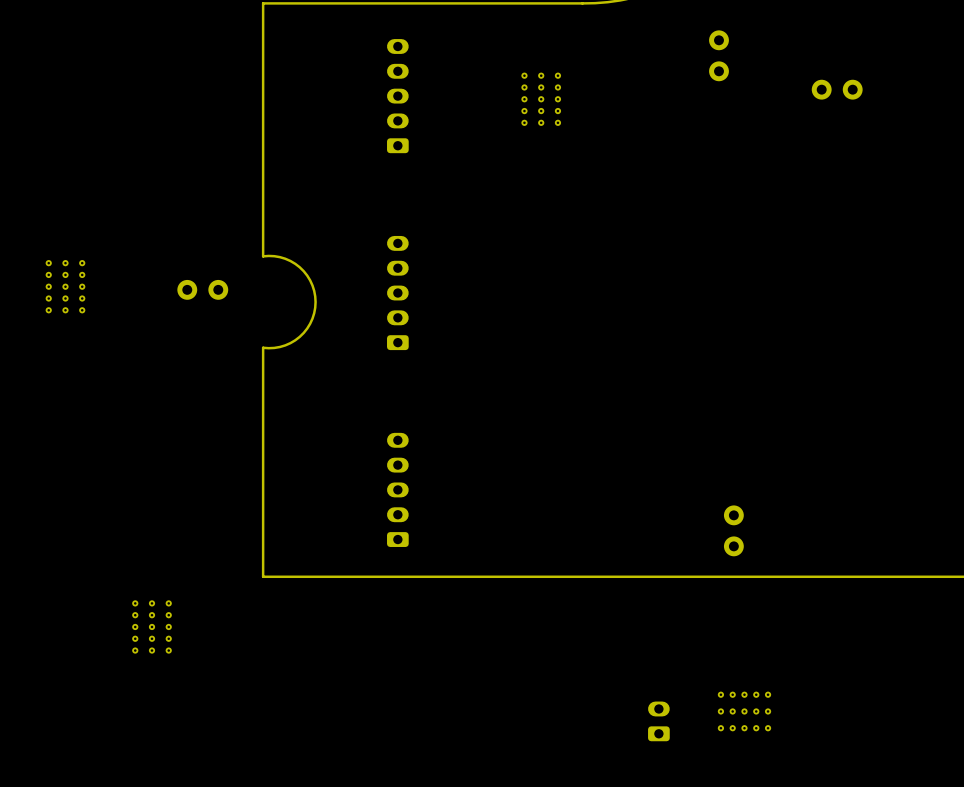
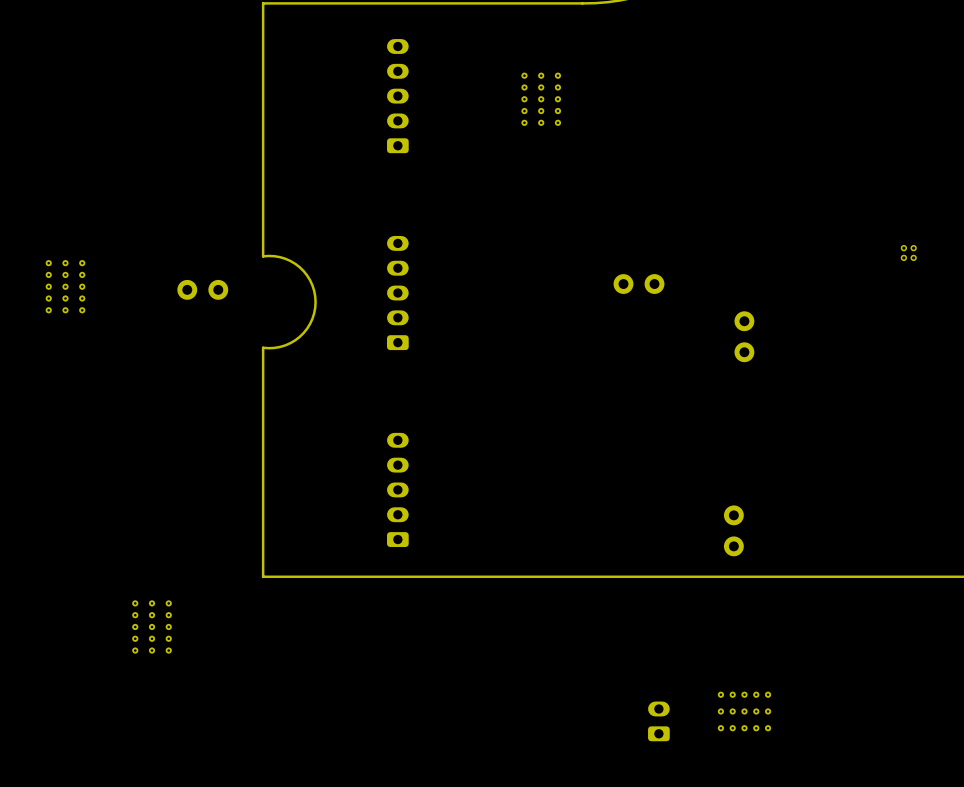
part: (718, 55) -> none
part: (837, 89) -> none
part: none -> (908, 253)
part: none -> (638, 284)
part: none -> (744, 336)

